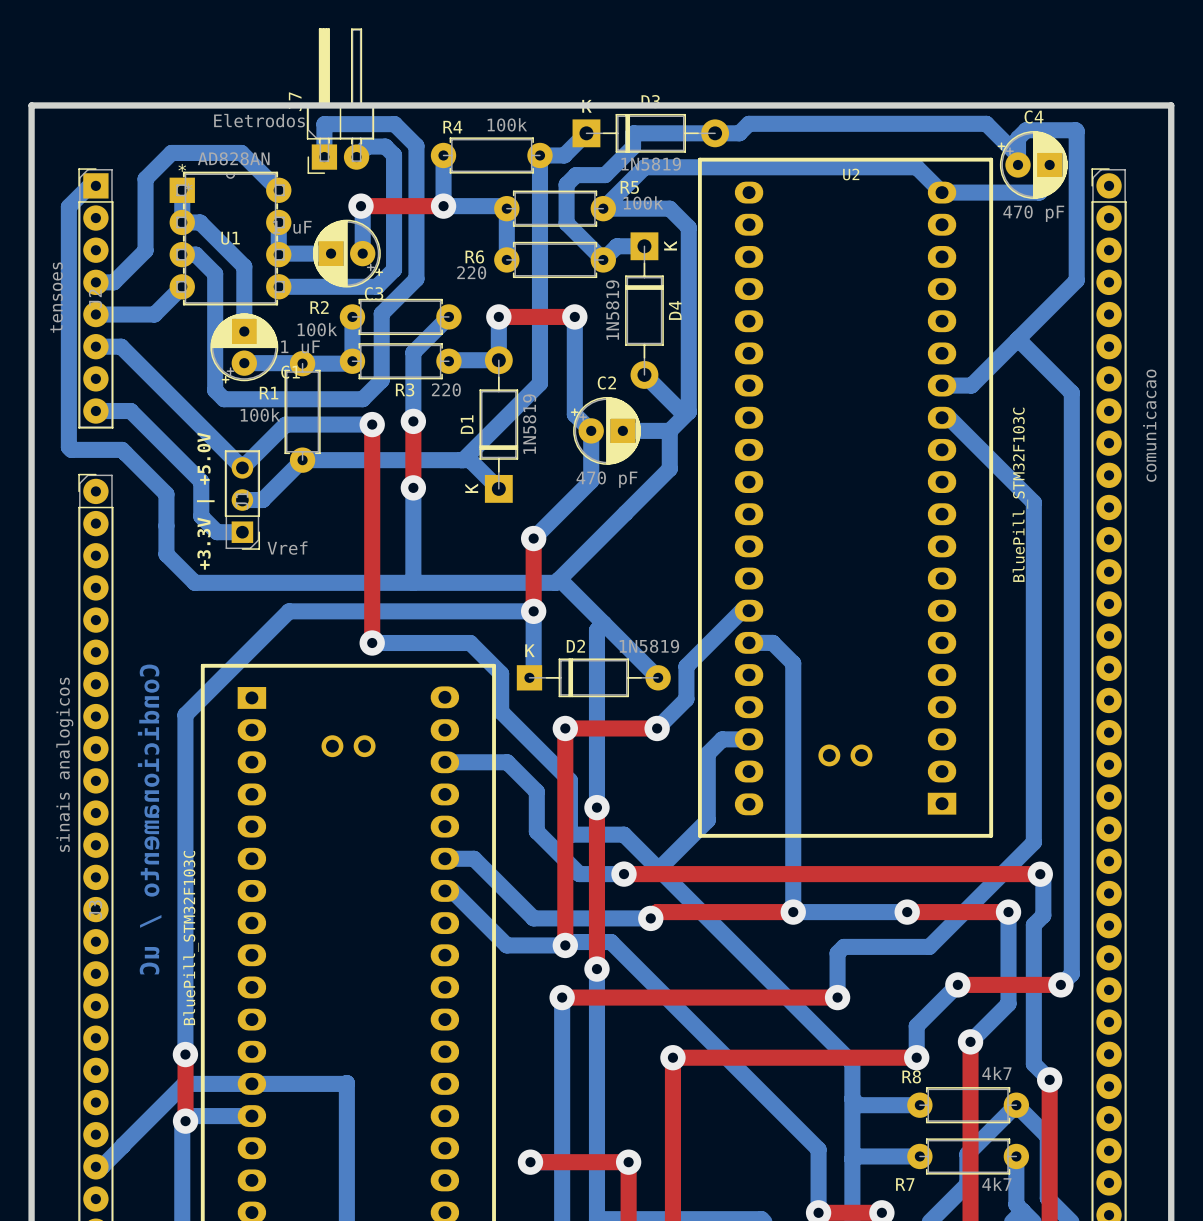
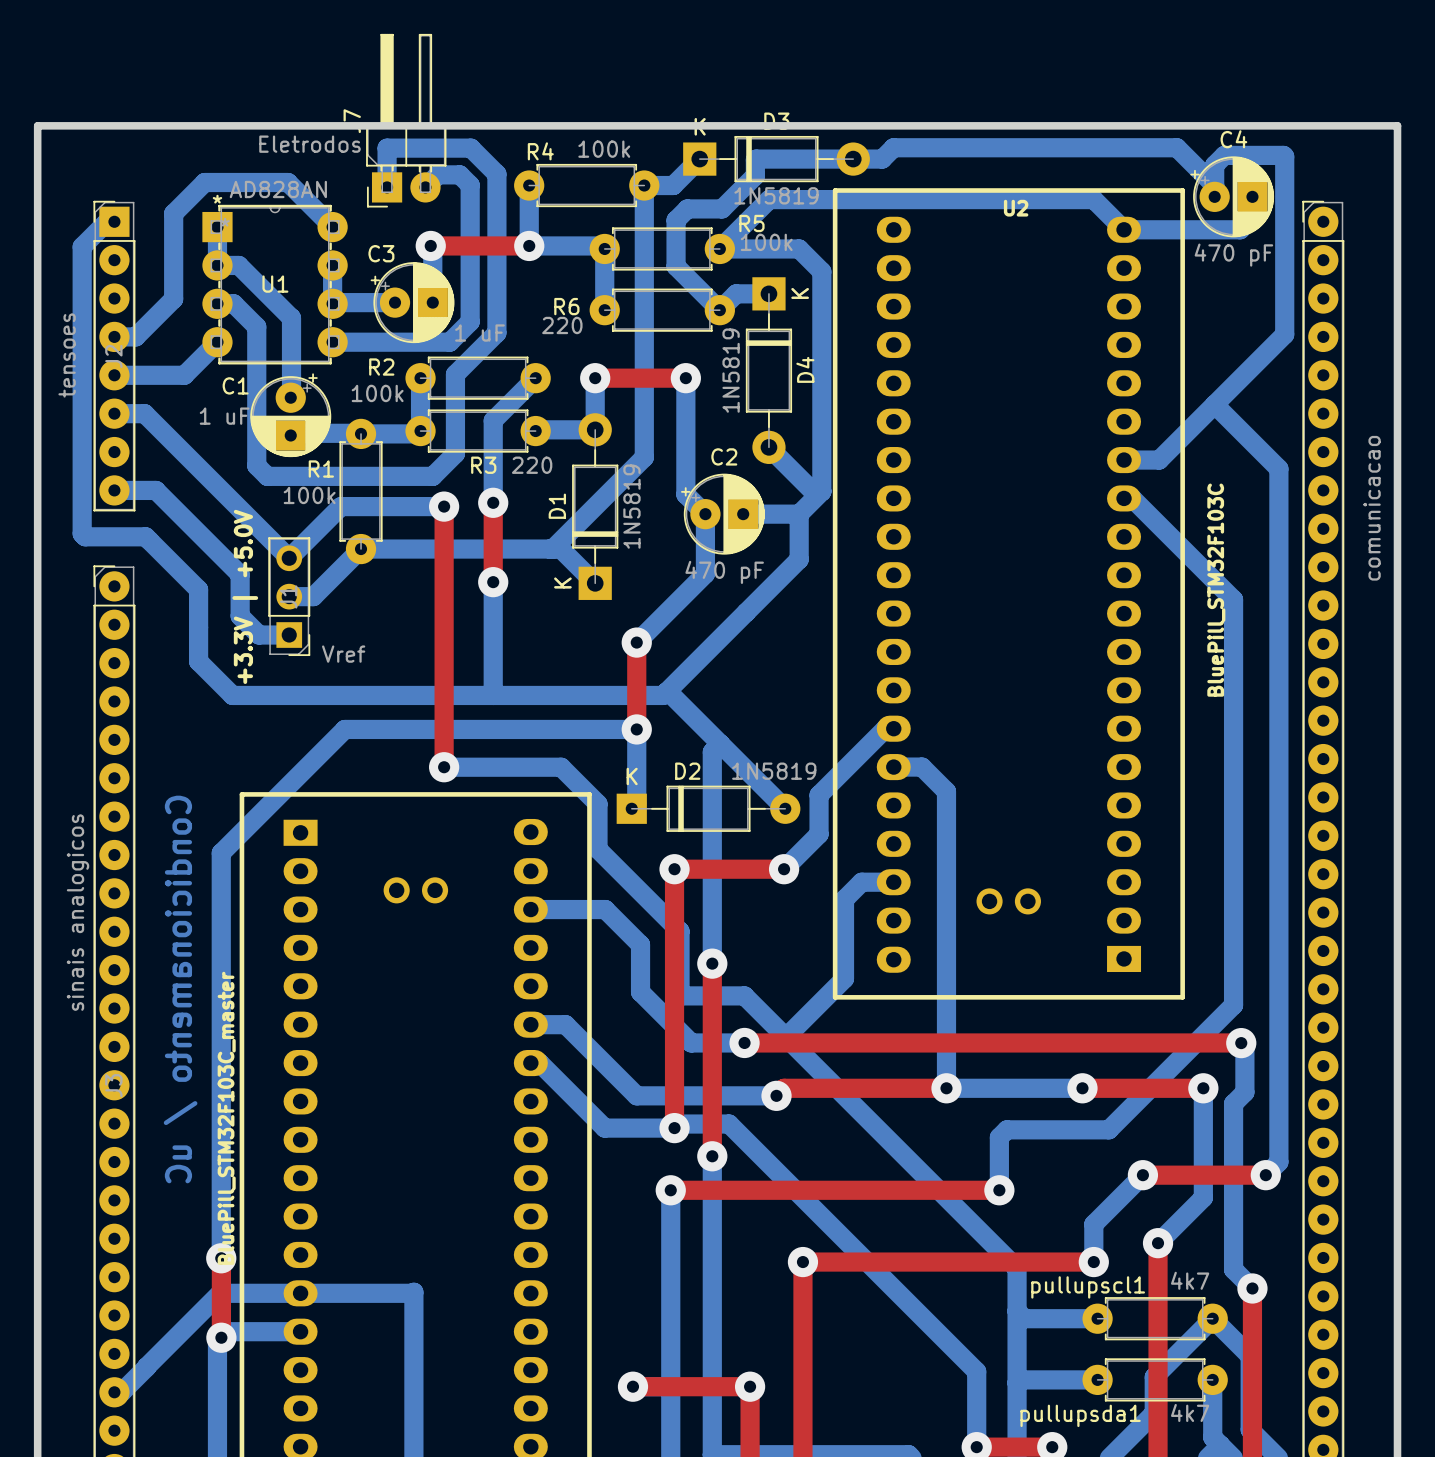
C3 rotation: 0° (348, 253) -> 180° (412, 302)
C1 rotation: 0° (244, 348) -> 180° (290, 415)
part value: BluePill_STM32F103C (190, 938) -> BluePill_STM32F103C_master (226, 1118)
R8 name: R8 (911, 1076) -> pullupscl1 (1088, 1287)
R7 name: R7 (905, 1184) -> pullupsda1 (1080, 1415)

